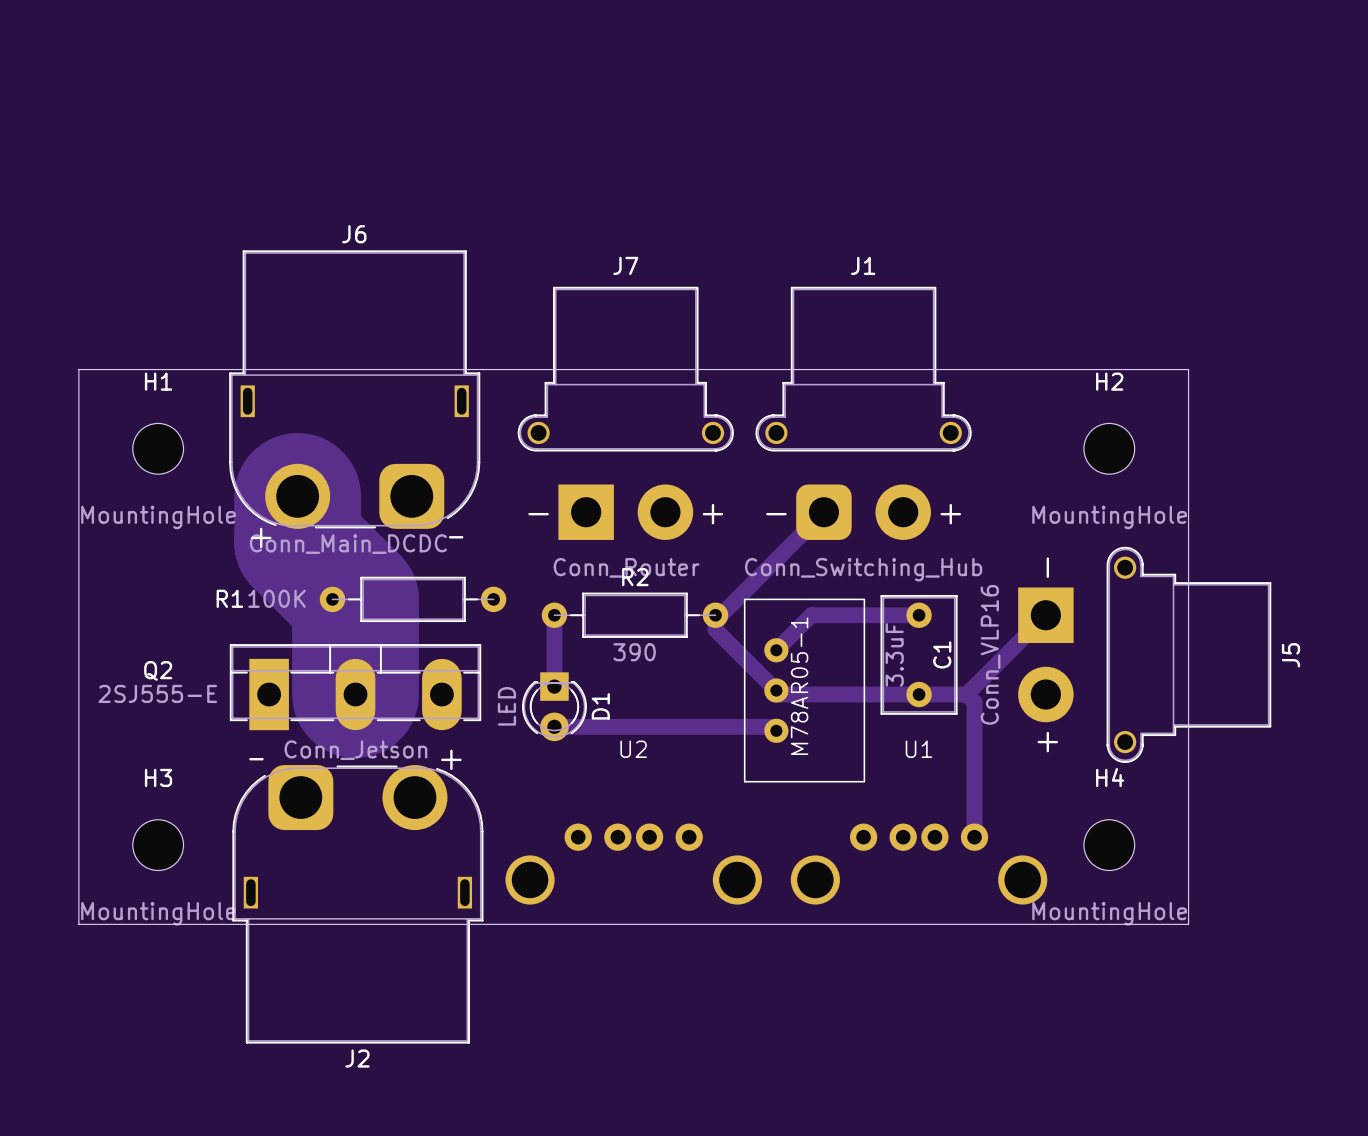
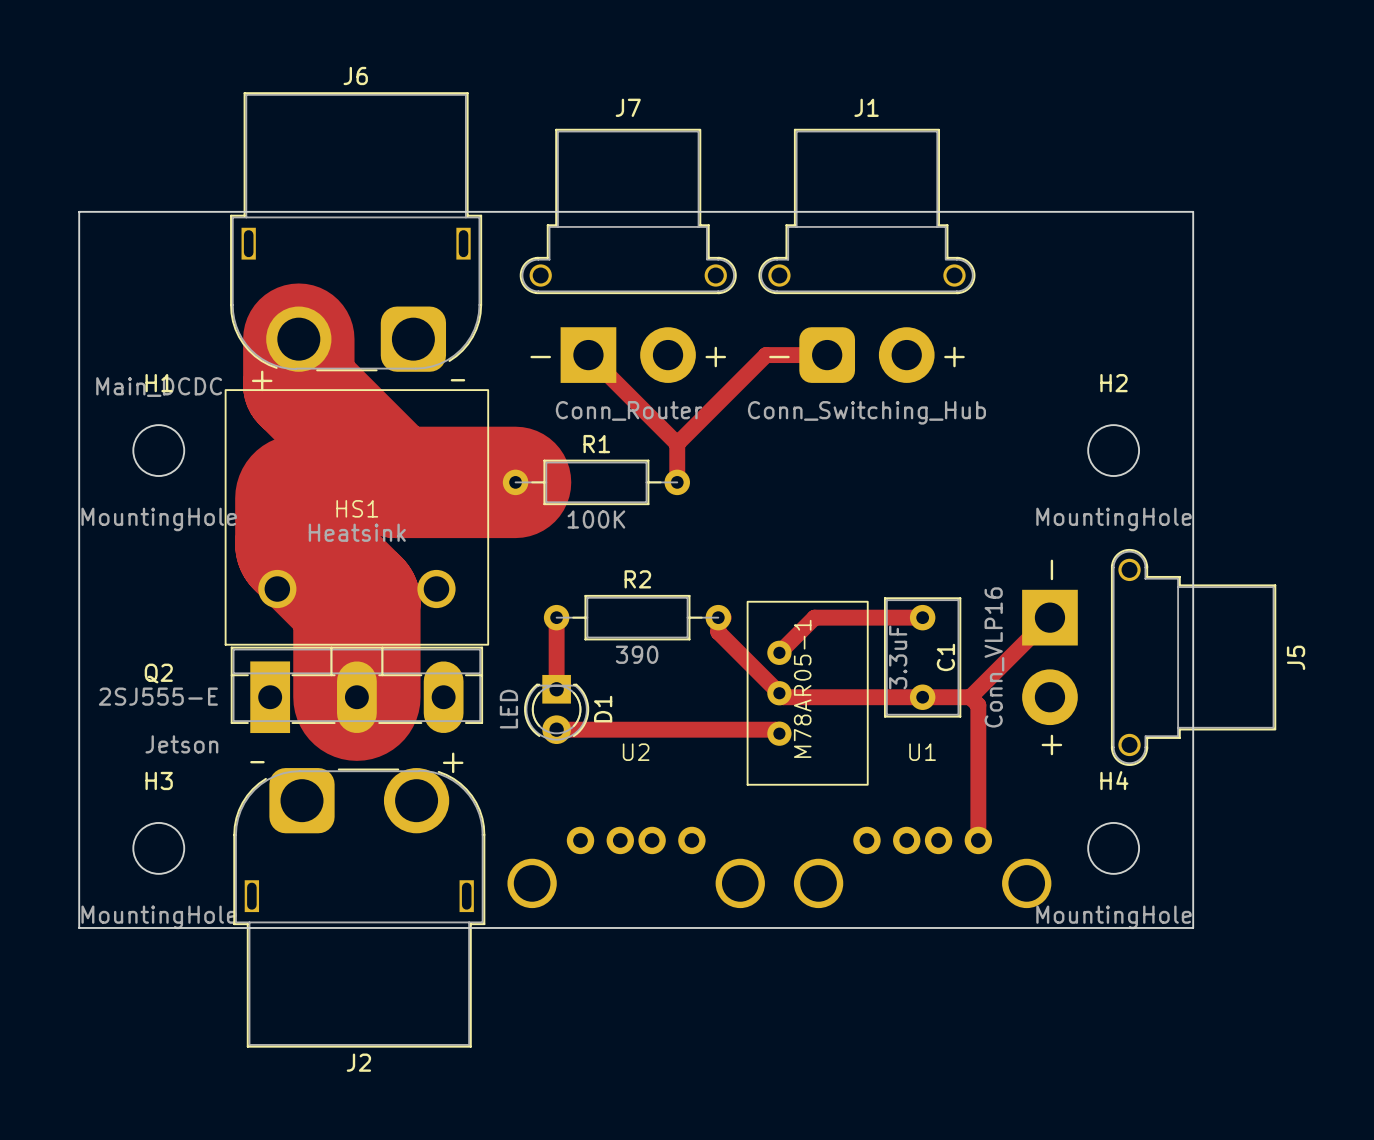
track: none -> (298, 339) (298, 385) (395, 482) (515, 482)
track: none -> (588, 355) (677, 443)
track: none -> (827, 355) (766, 355) (677, 443)
board edge: (78, 369) (1188, 369) -> (79, 370) (79, 211) (1193, 211) (1193, 370)
J6 position: (354, 389) -> (356, 231)
J7 position: (625, 413) -> (628, 255)
J1 position: (863, 413) -> (866, 255)
track: none -> (677, 443) (677, 482)
track: (823, 512) (720, 615) -> none
HS1: none -> Heatsink (356, 517)
J6 value: Conn_Main_DCDC (348, 544) -> Main_DCDC (159, 387)
R1 name position: R1 (229, 598) -> R1 (596, 444)
R1 value position: 100K (277, 598) -> 100K (596, 519)
R1 position: (413, 599) -> (596, 482)
J2 value: Conn_Jetson (355, 750) -> Jetson (181, 744)

